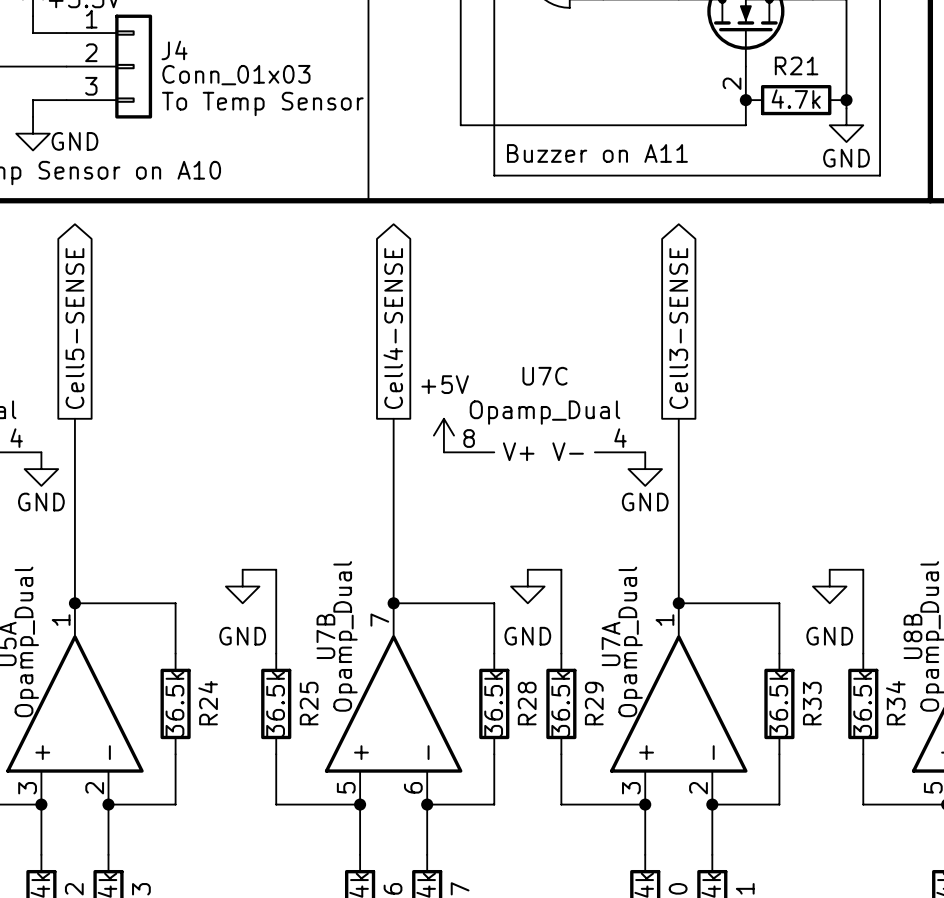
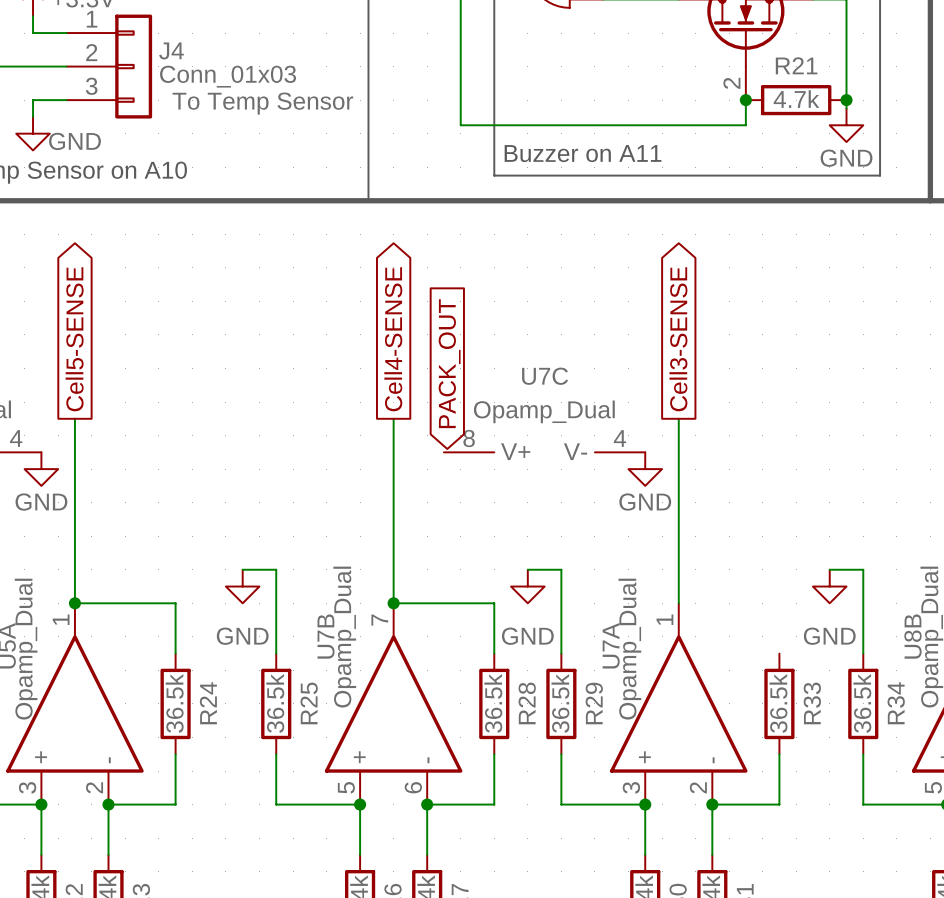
global label: none -> PACK_OUT (449, 363)
power symbol: +5V (443, 435) -> none
wire: (678, 603) (779, 603) (779, 653) -> none
junction: (678, 603) -> none

